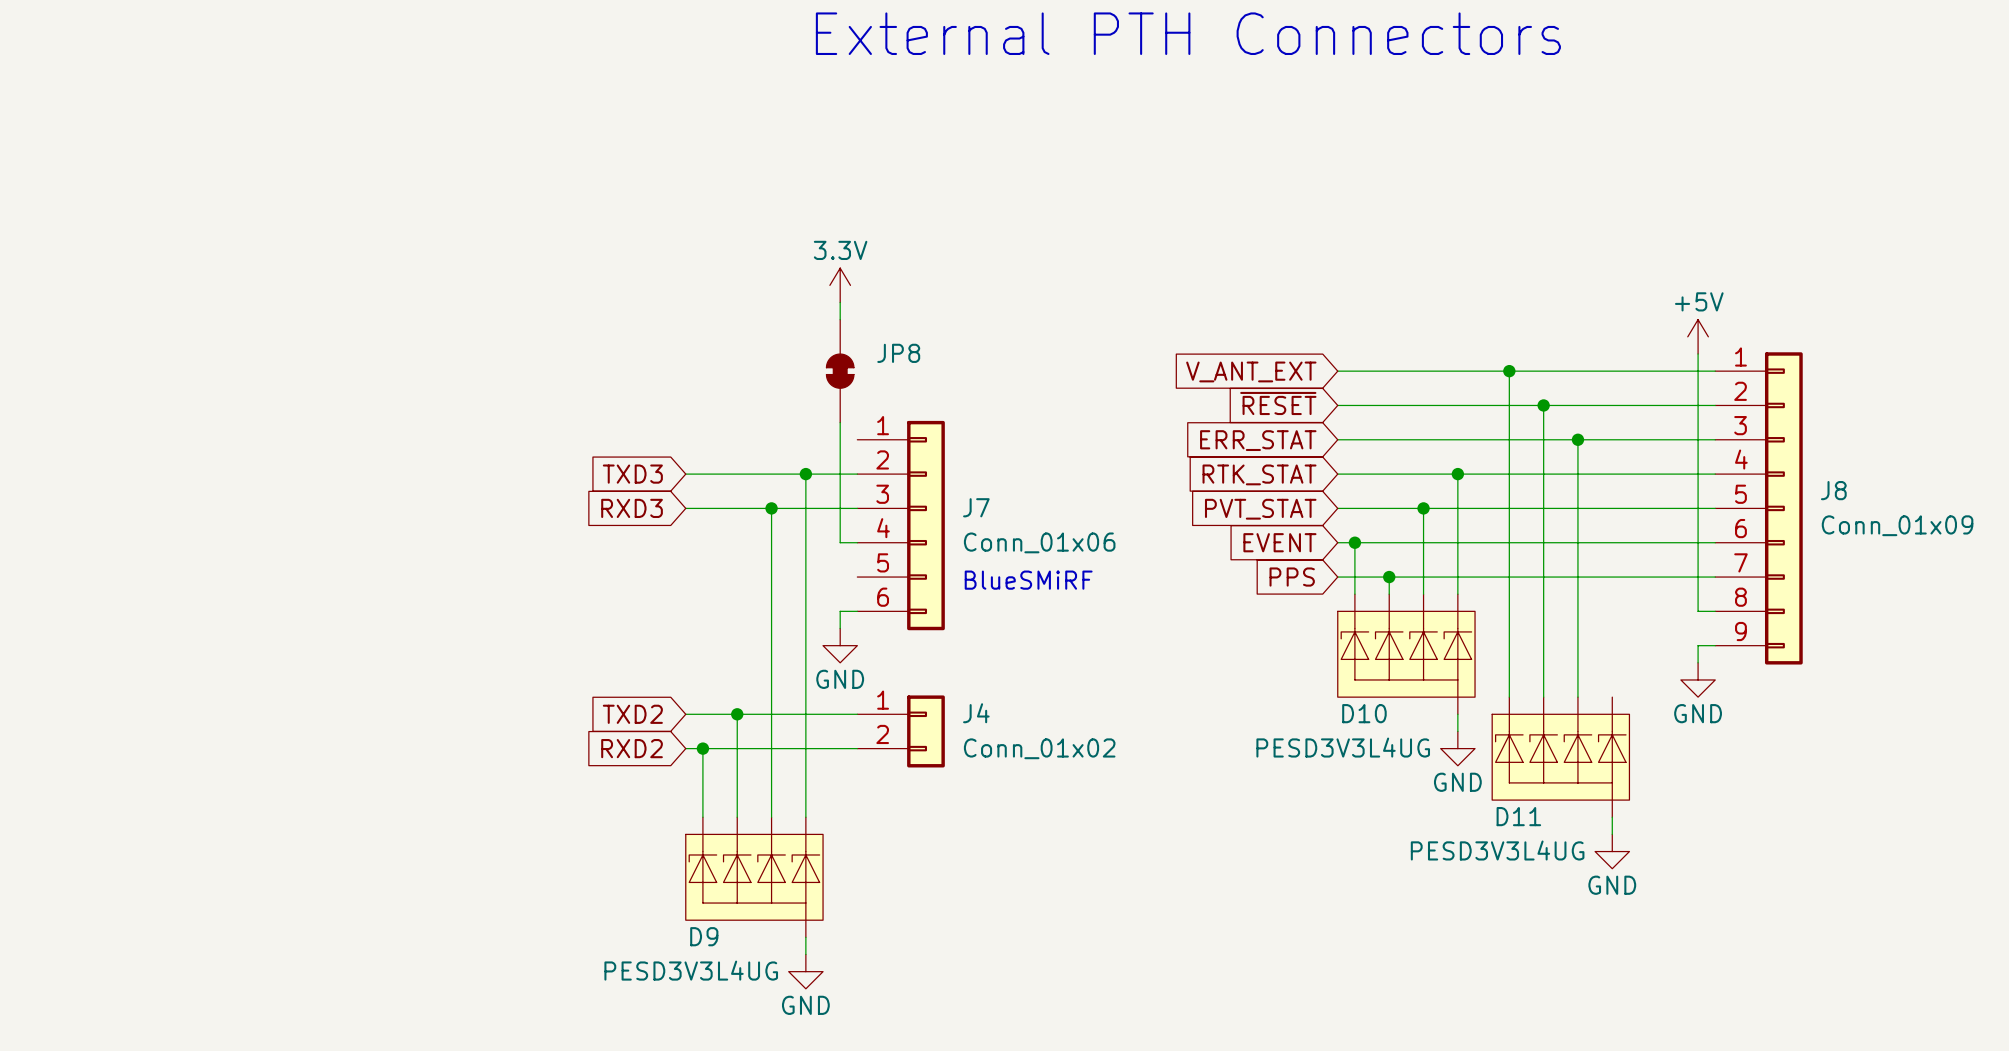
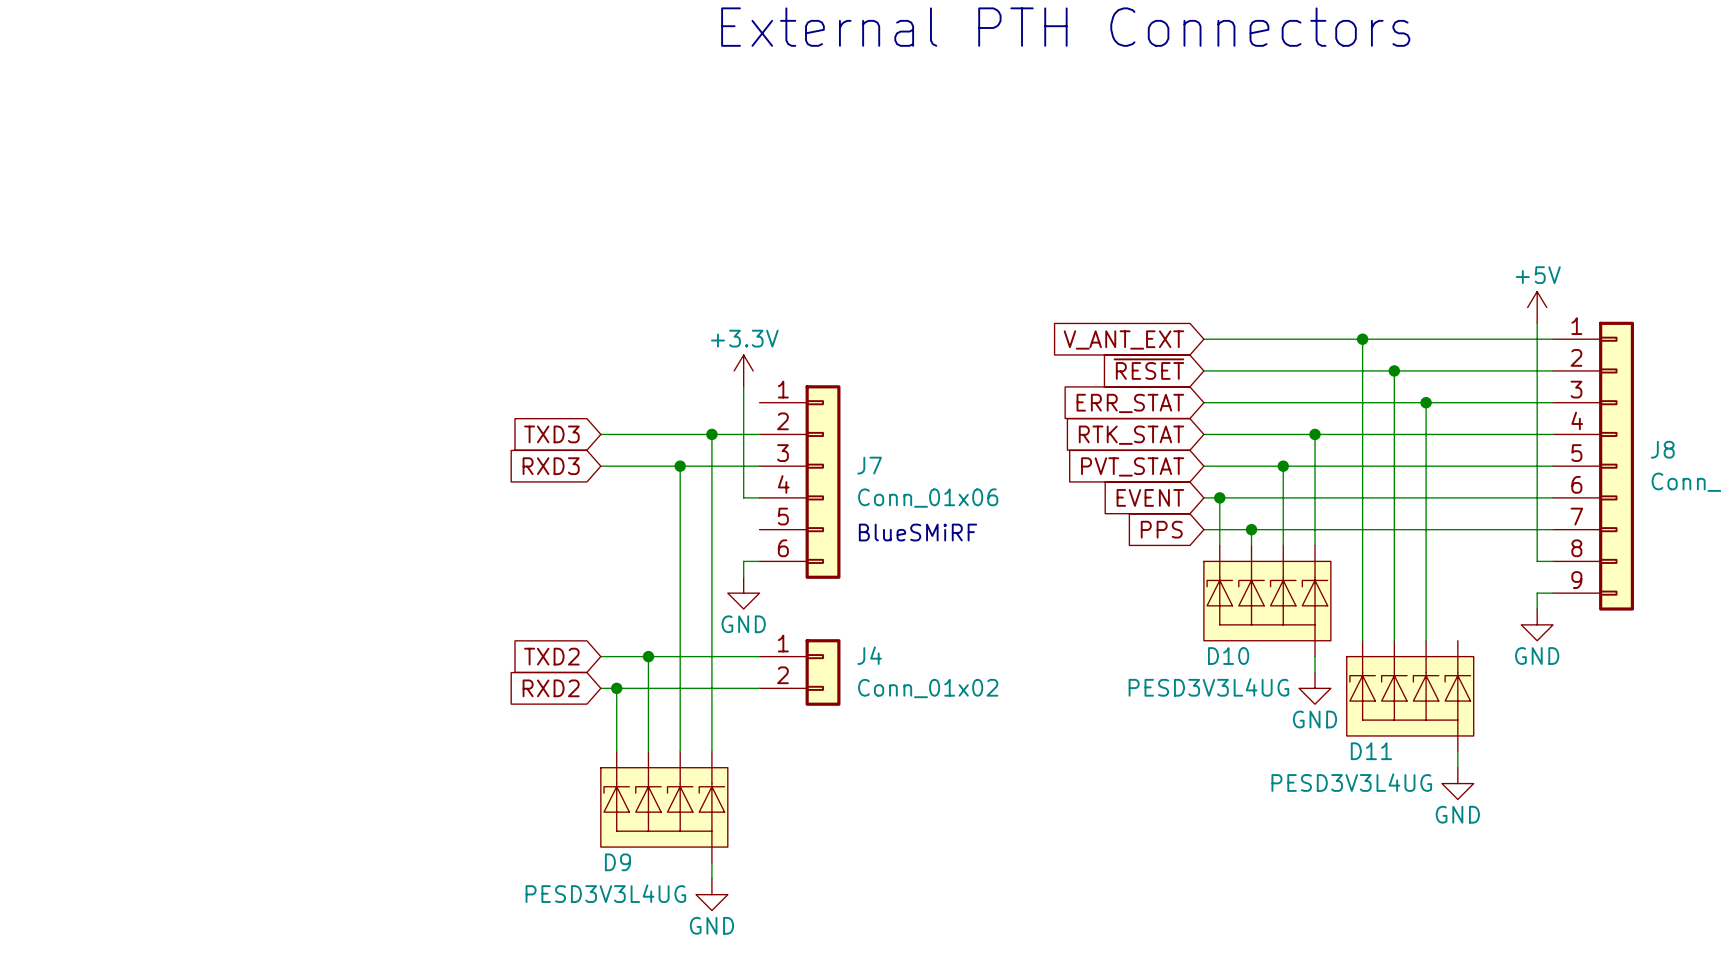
power symbol: 3.3V (840, 285) -> none
wire: (840, 302) (840, 319) -> none
JP8: (840, 371) -> none
power symbol: none -> +3.3V (743, 370)

